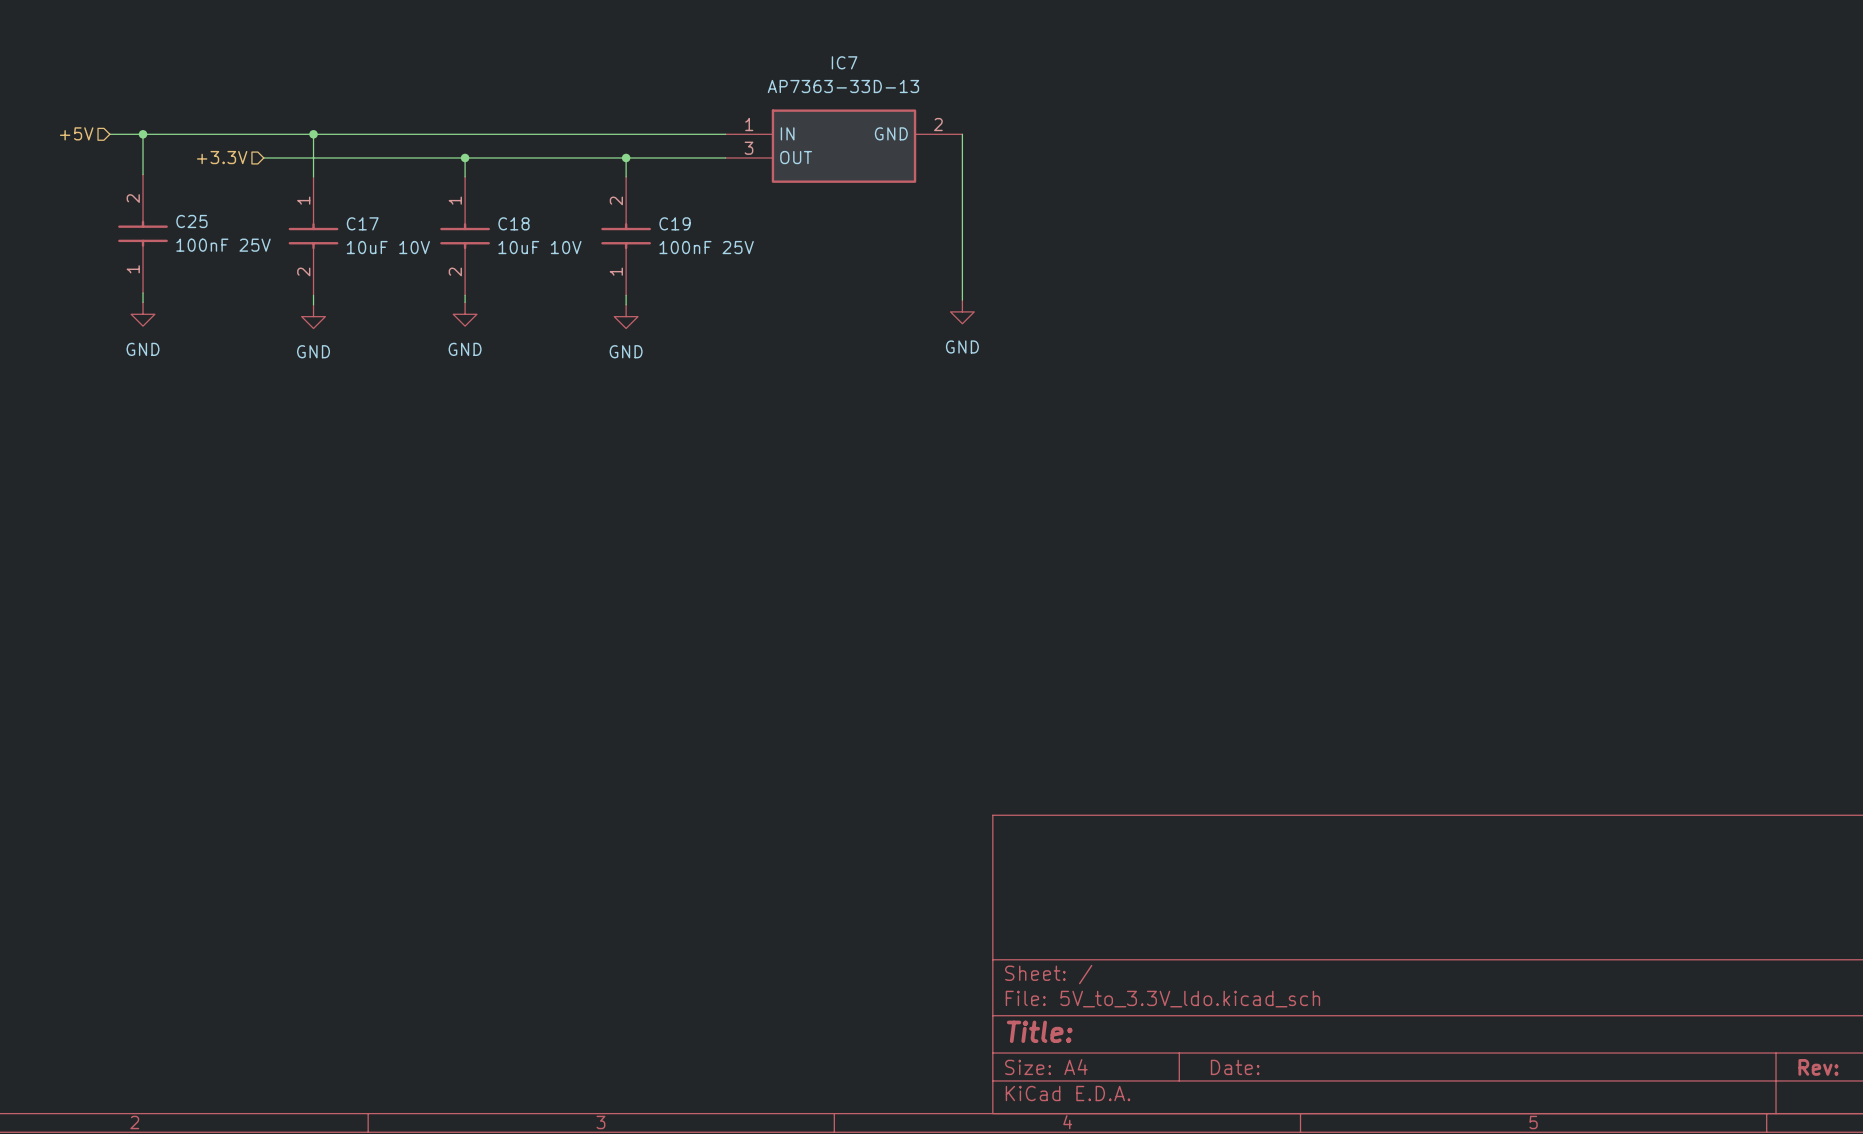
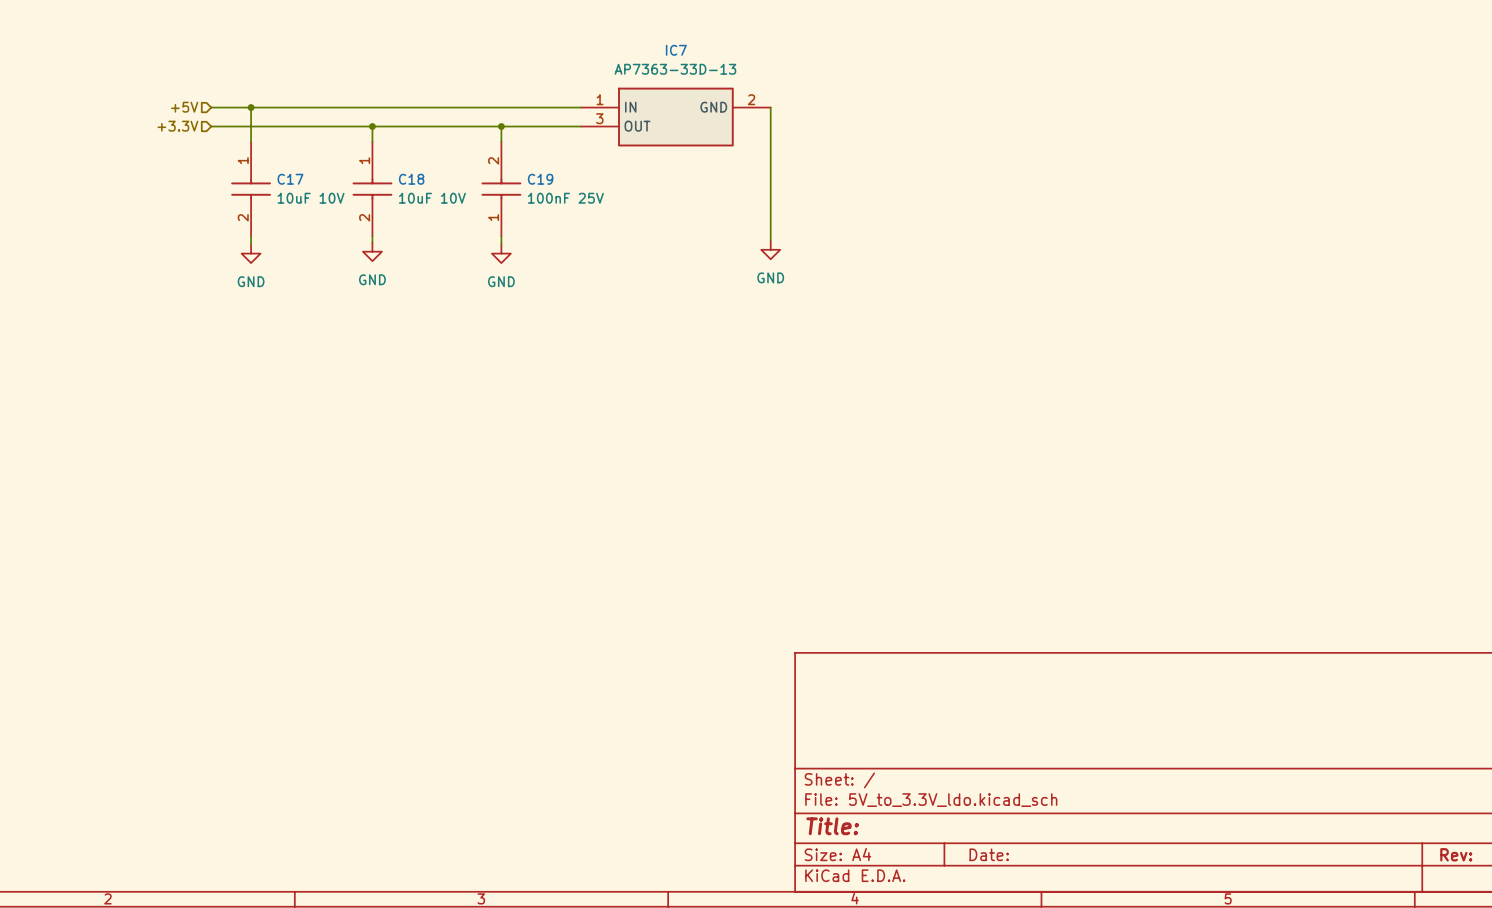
hierarchical label position: +5V (76, 133) -> +5V (184, 107)
wire: (109, 134) (263, 134) -> none
wire: (143, 134) (143, 174) -> none
junction: (143, 134) -> none
C25: 100nF 25V (143, 233) -> none
wire: (143, 292) (143, 302) -> none
power symbol: GND (143, 314) -> none

